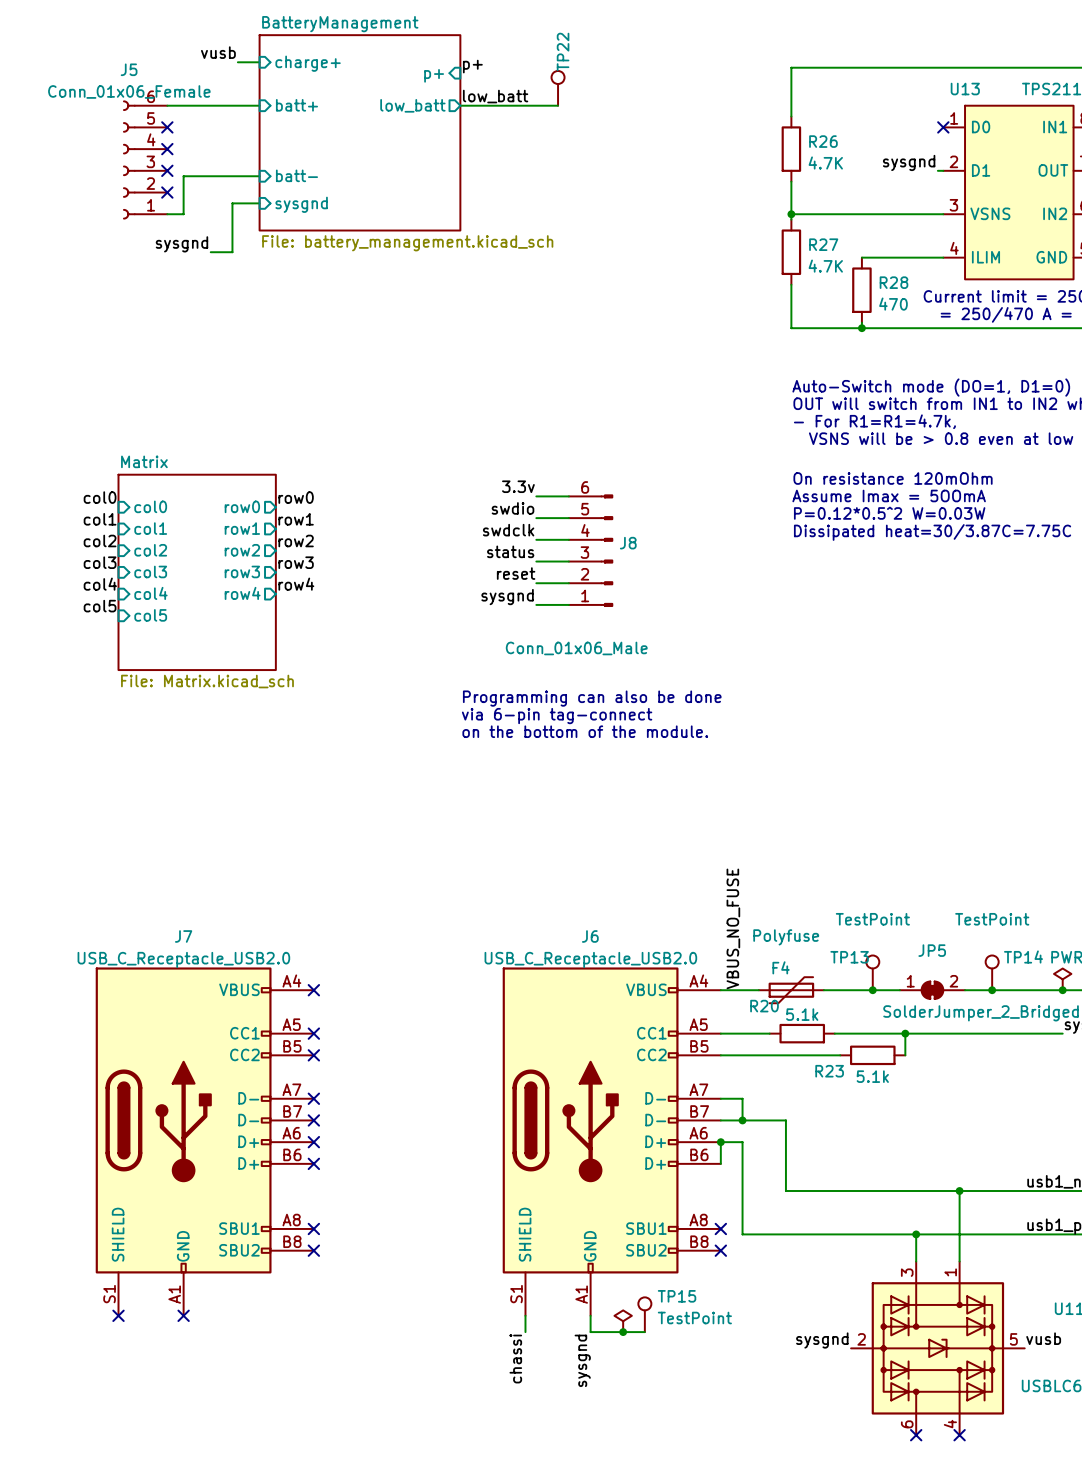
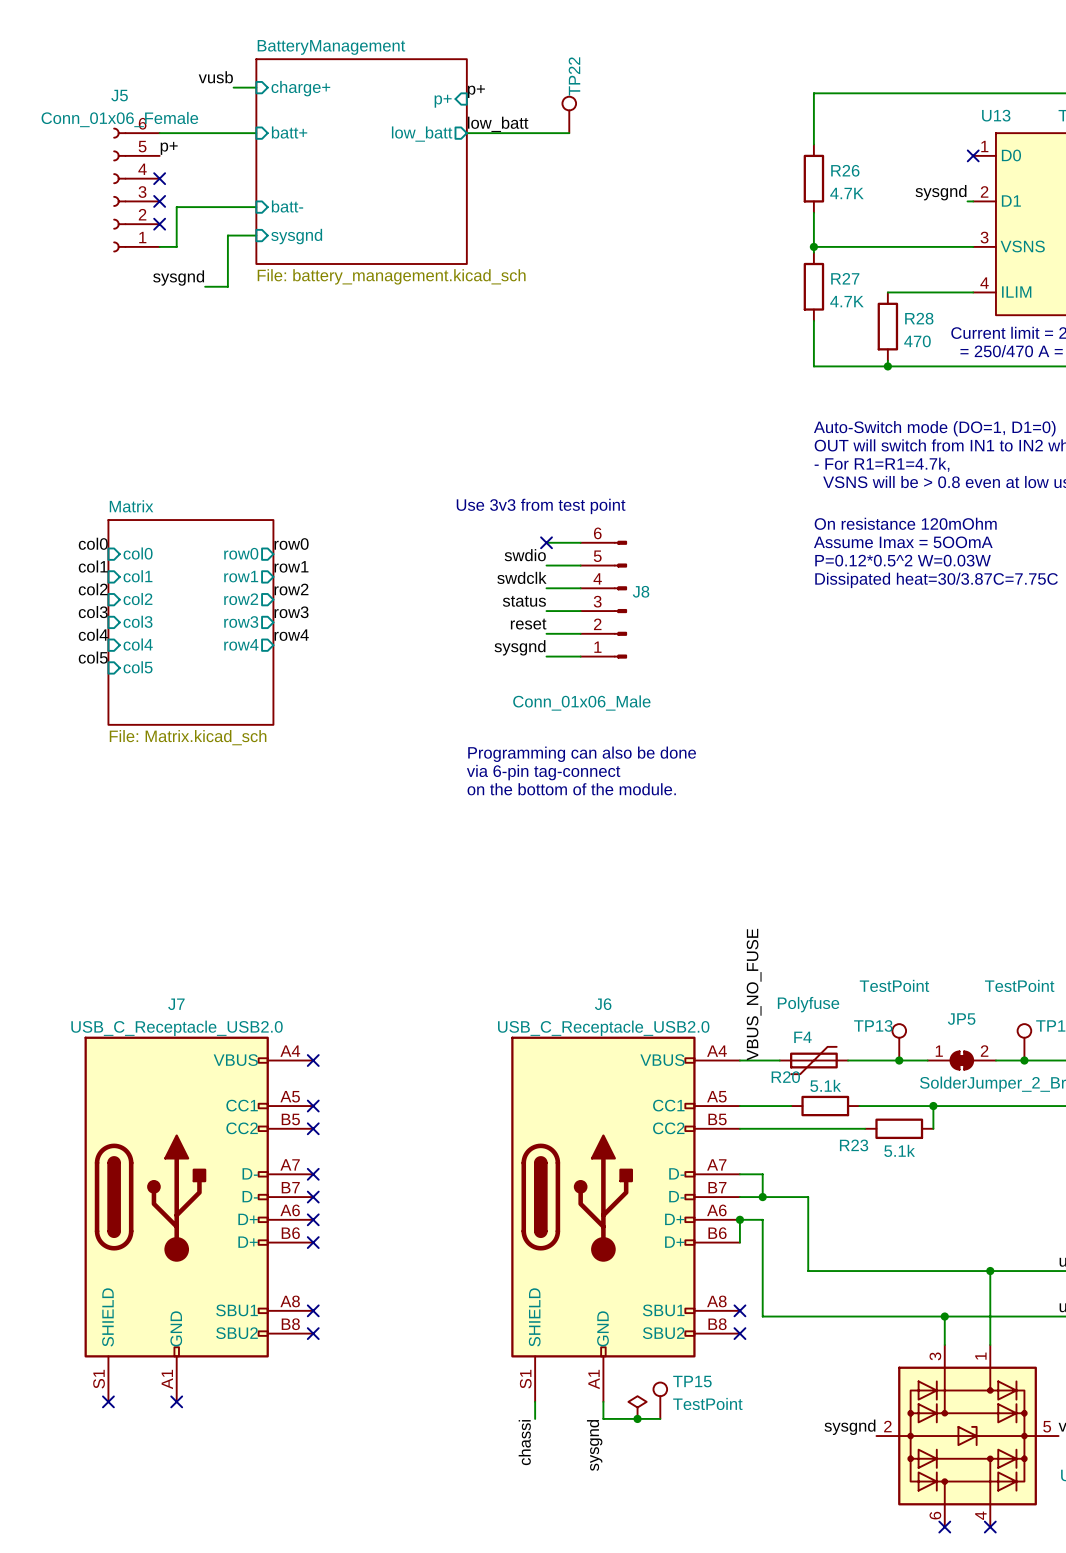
label: none -> p+ (169, 148)
no-connect mark: (167, 127) -> none
text: none -> Use 3v3 from test point (541, 506)
label: 3.3v (518, 486) -> none
no-connect mark: none -> (546, 542)

